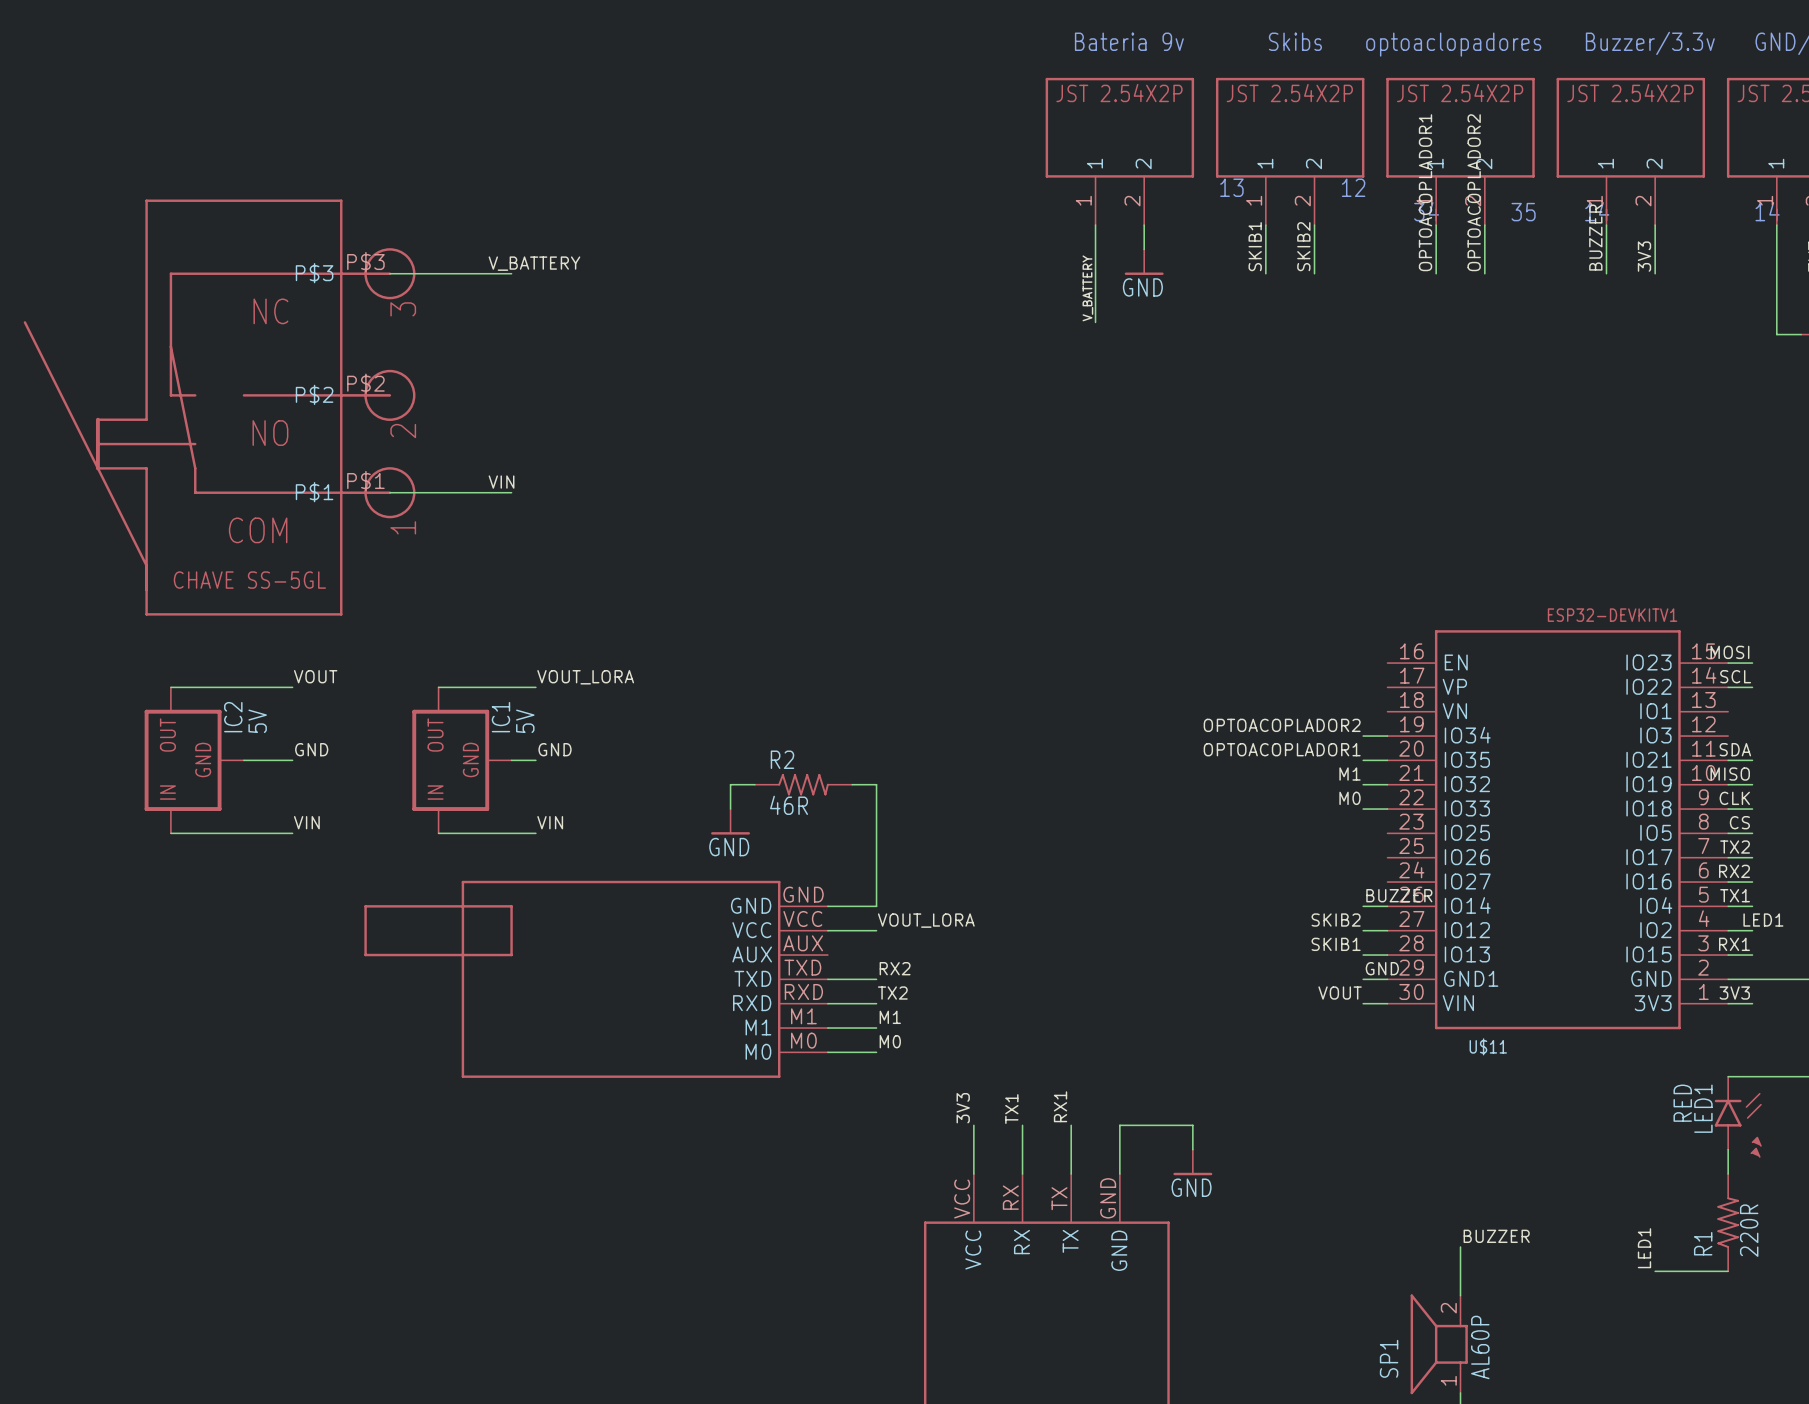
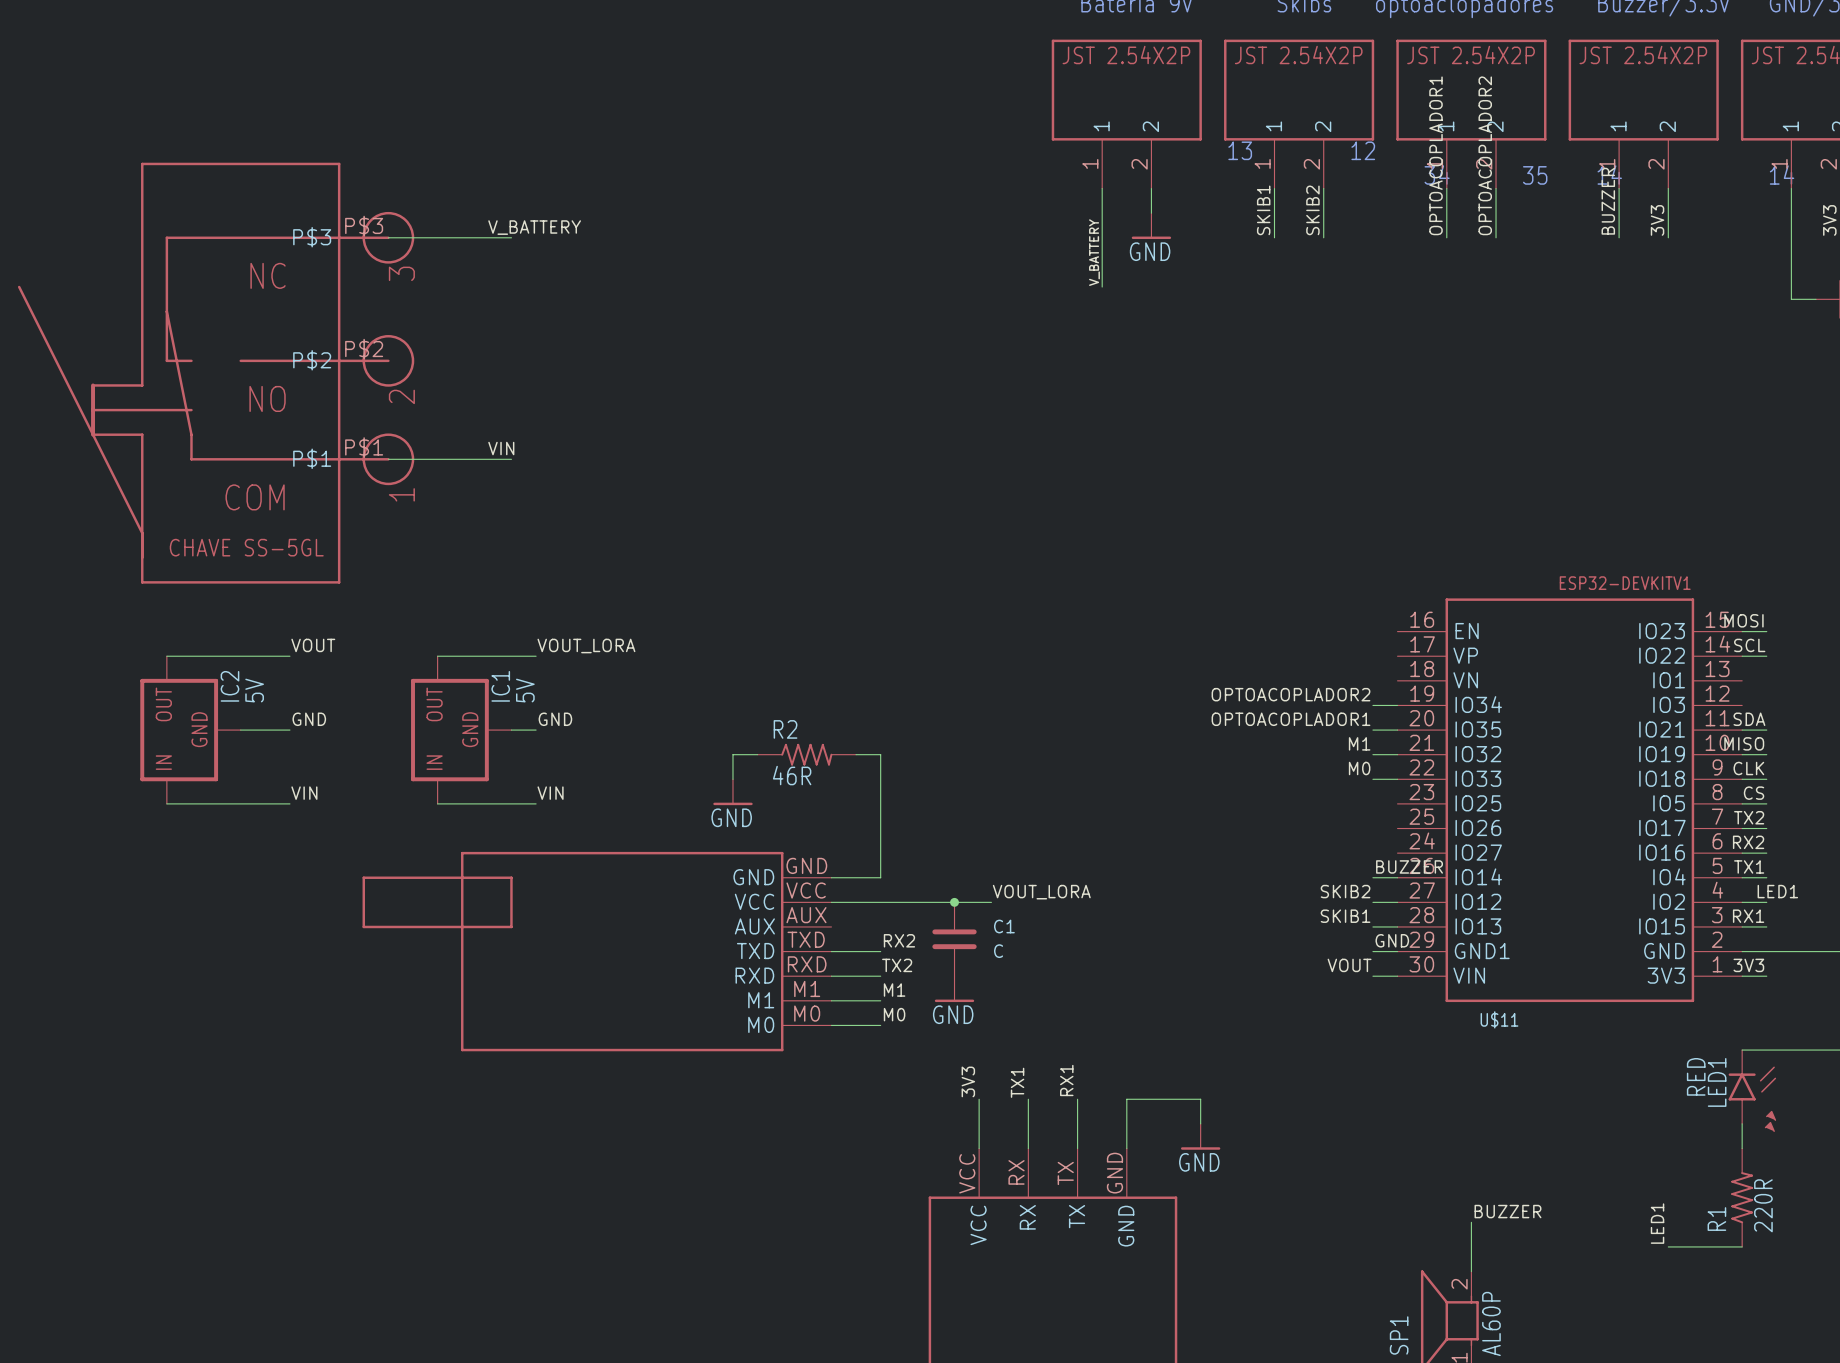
label position: VOUT_LORA (926, 920) -> VOUT_LORA (1041, 892)
wire: none -> (880, 902) (991, 902)
junction: none -> (954, 902)
C1: none -> C (954, 939)
power symbol: none -> GND (954, 989)

